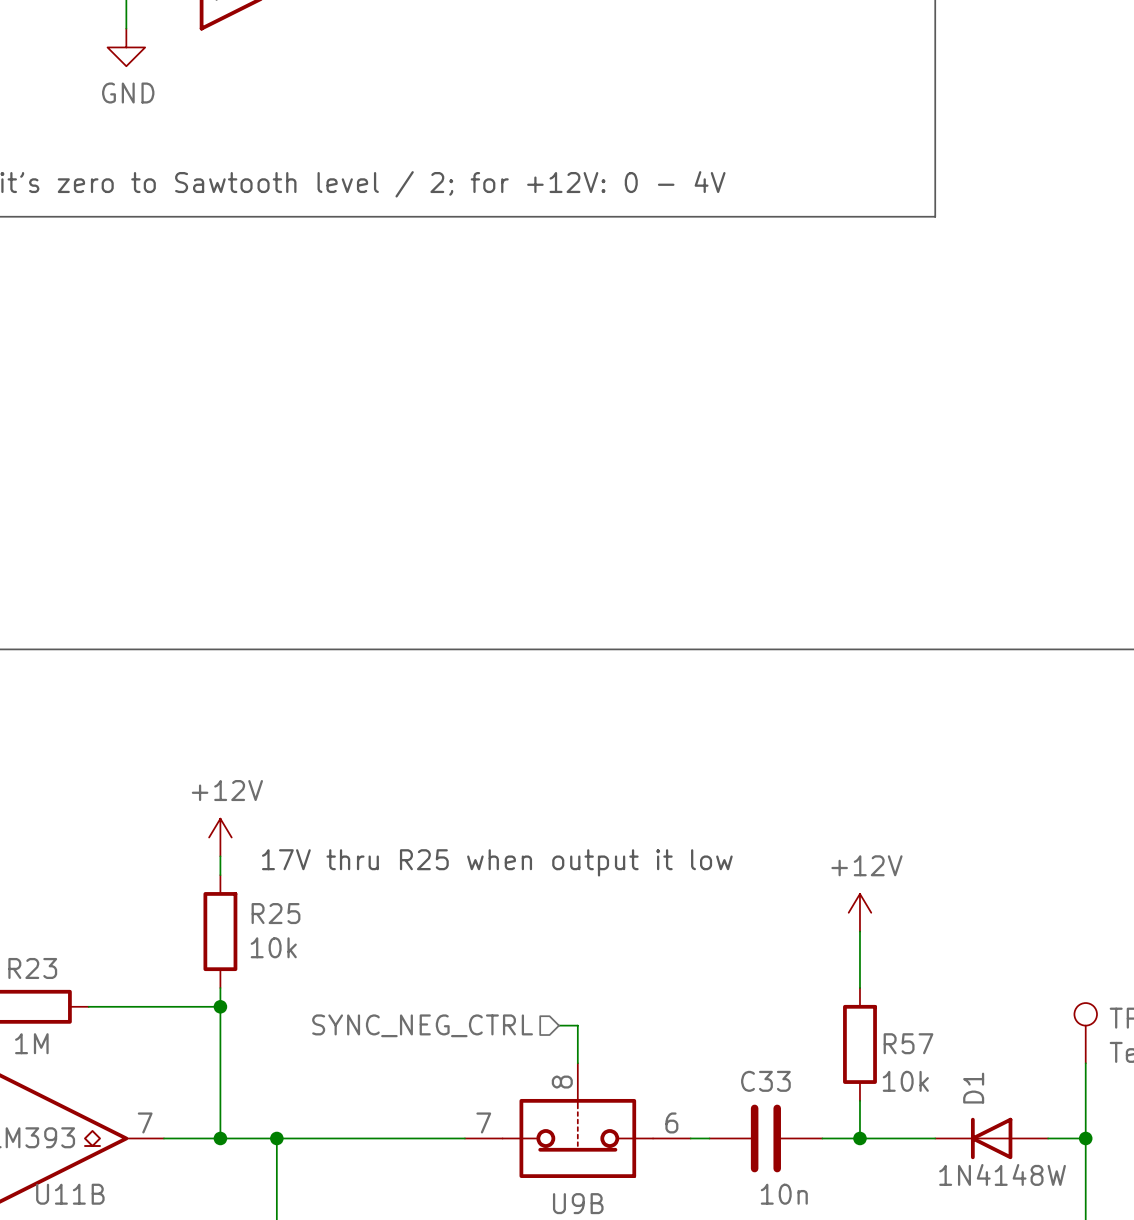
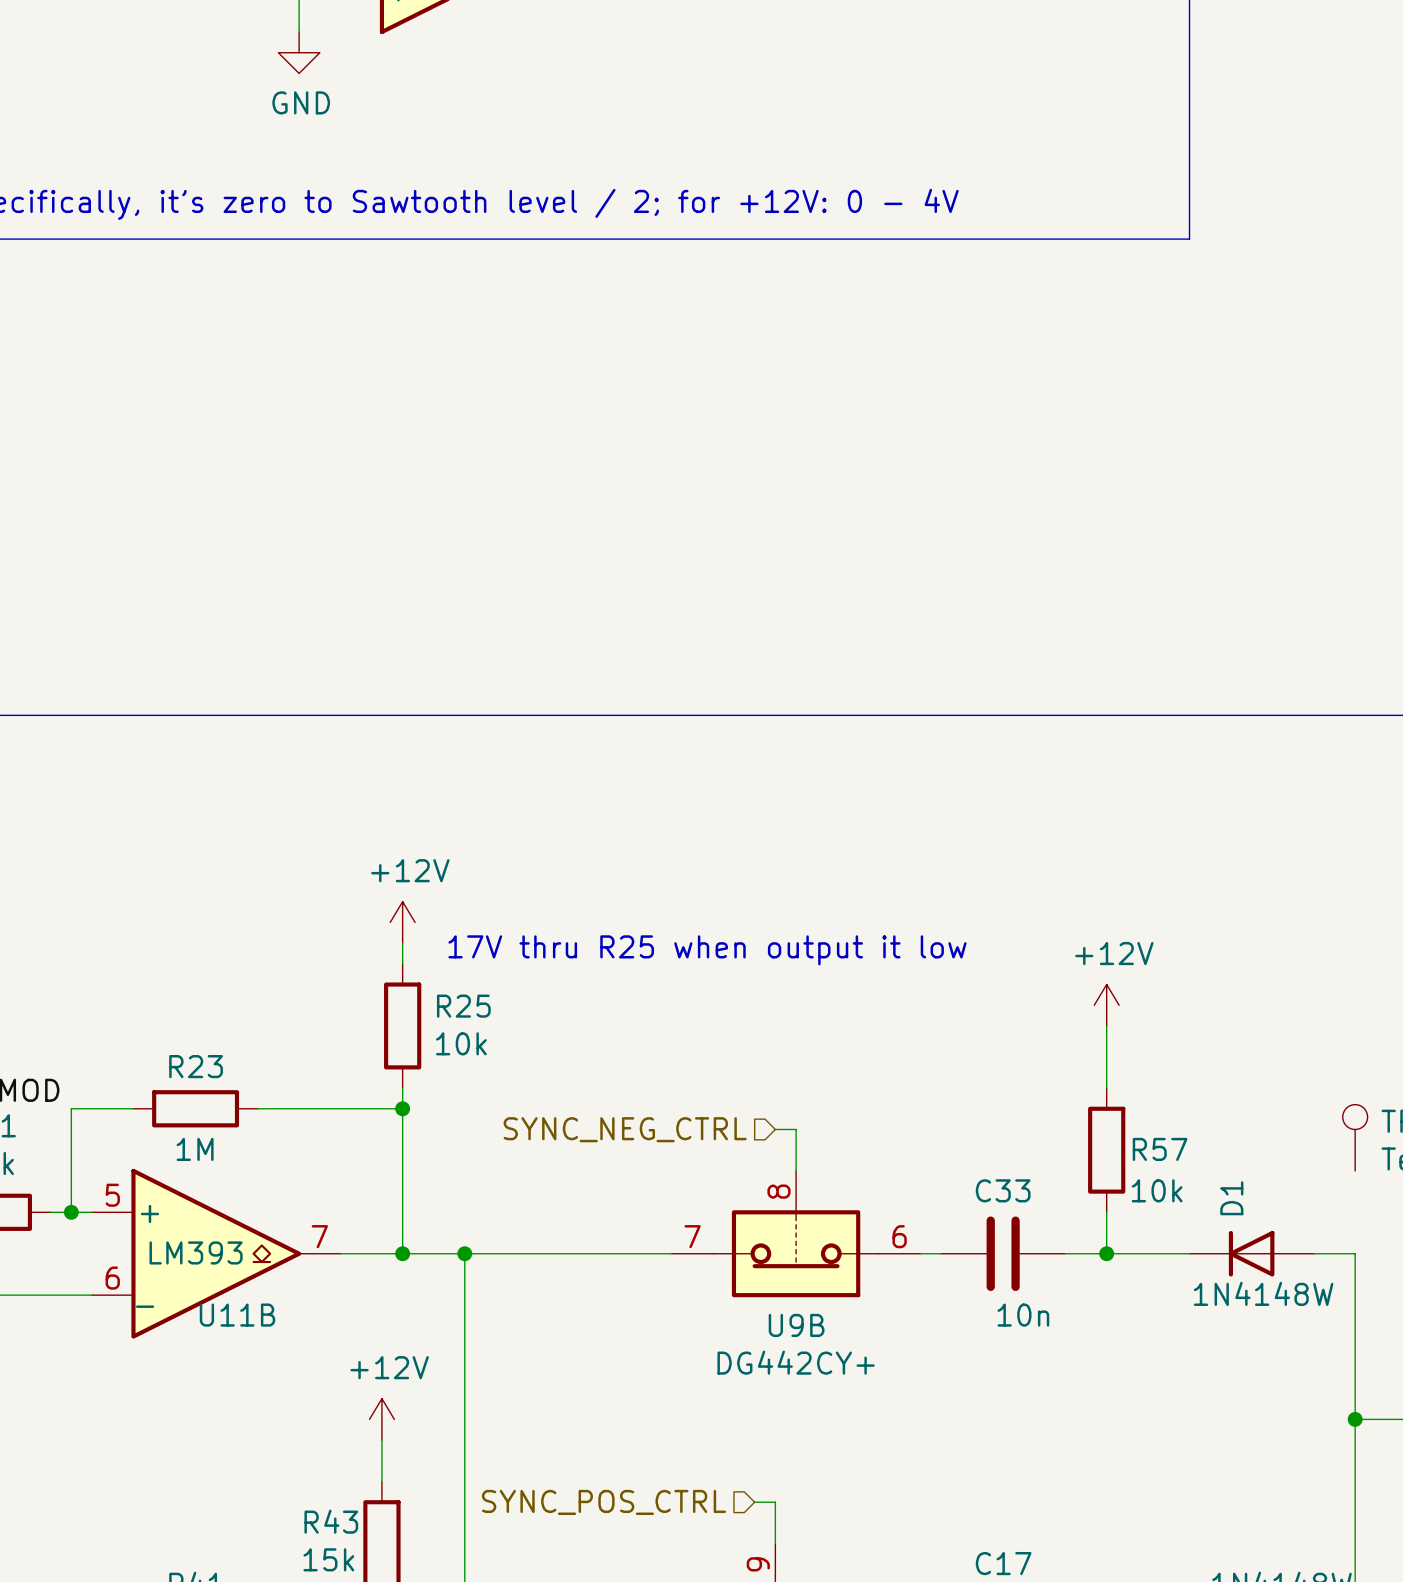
wire: (1085, 1063) (1085, 1138) -> none
junction: (1085, 1138) -> none

